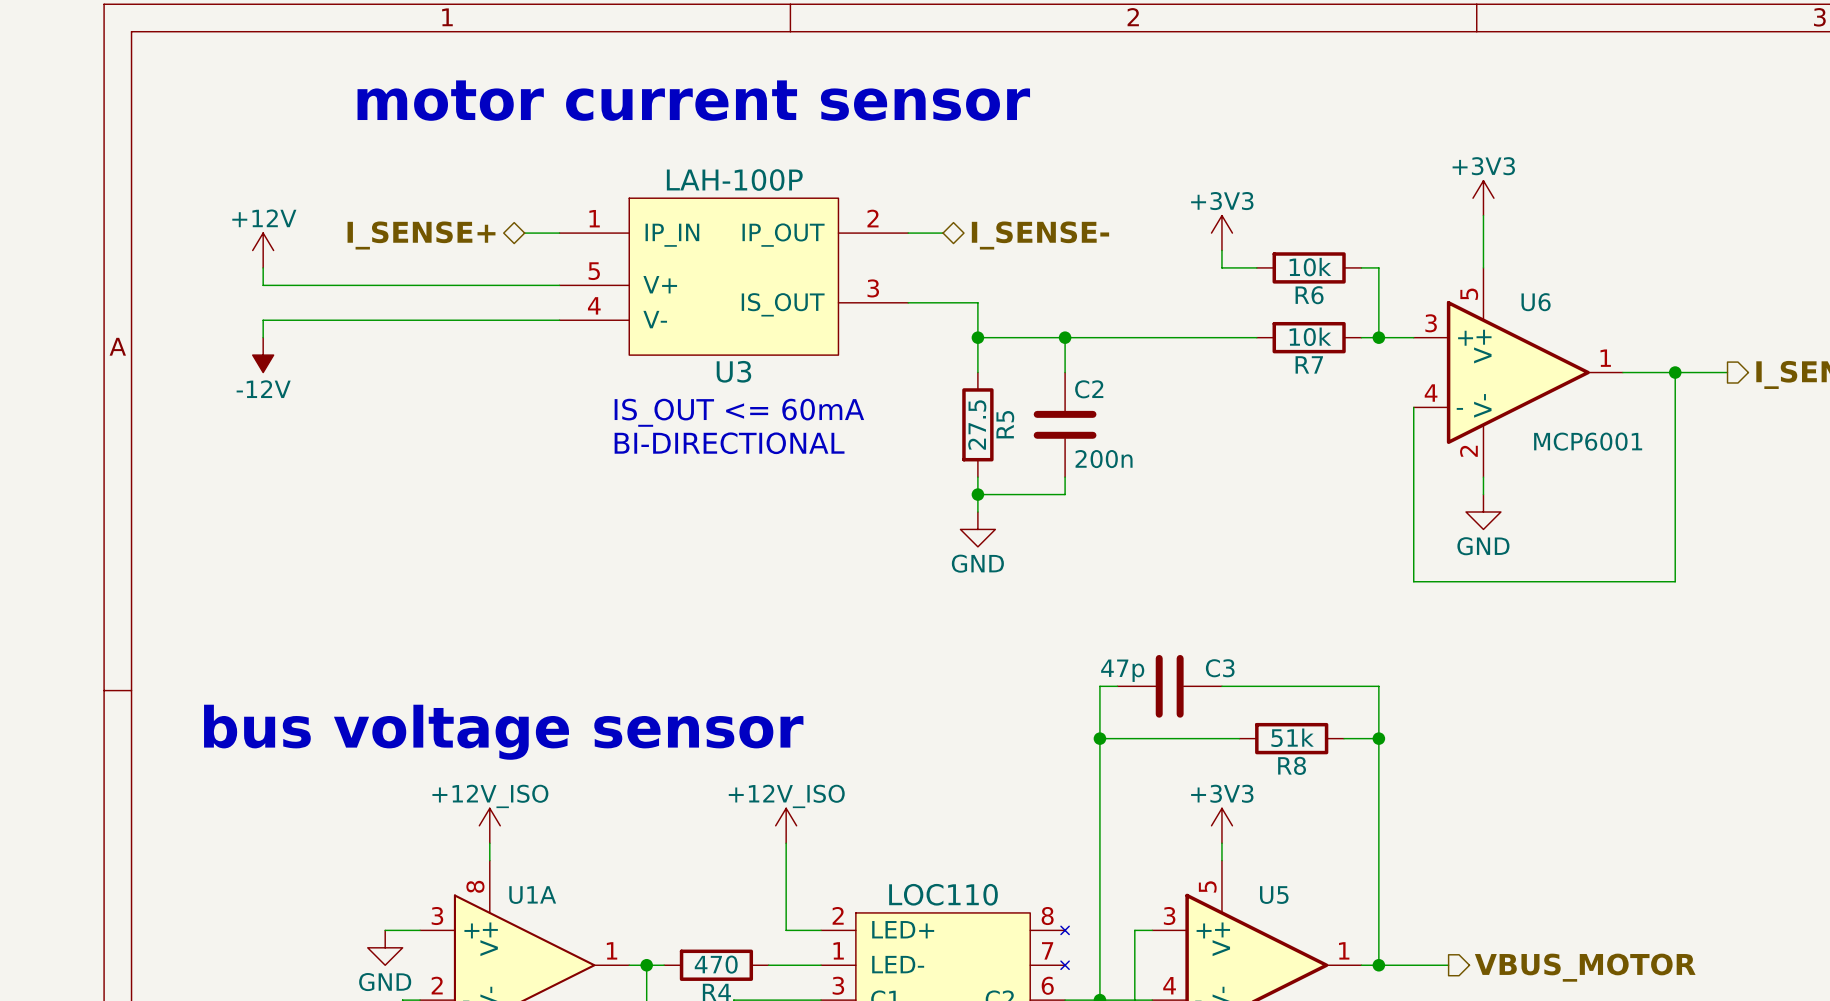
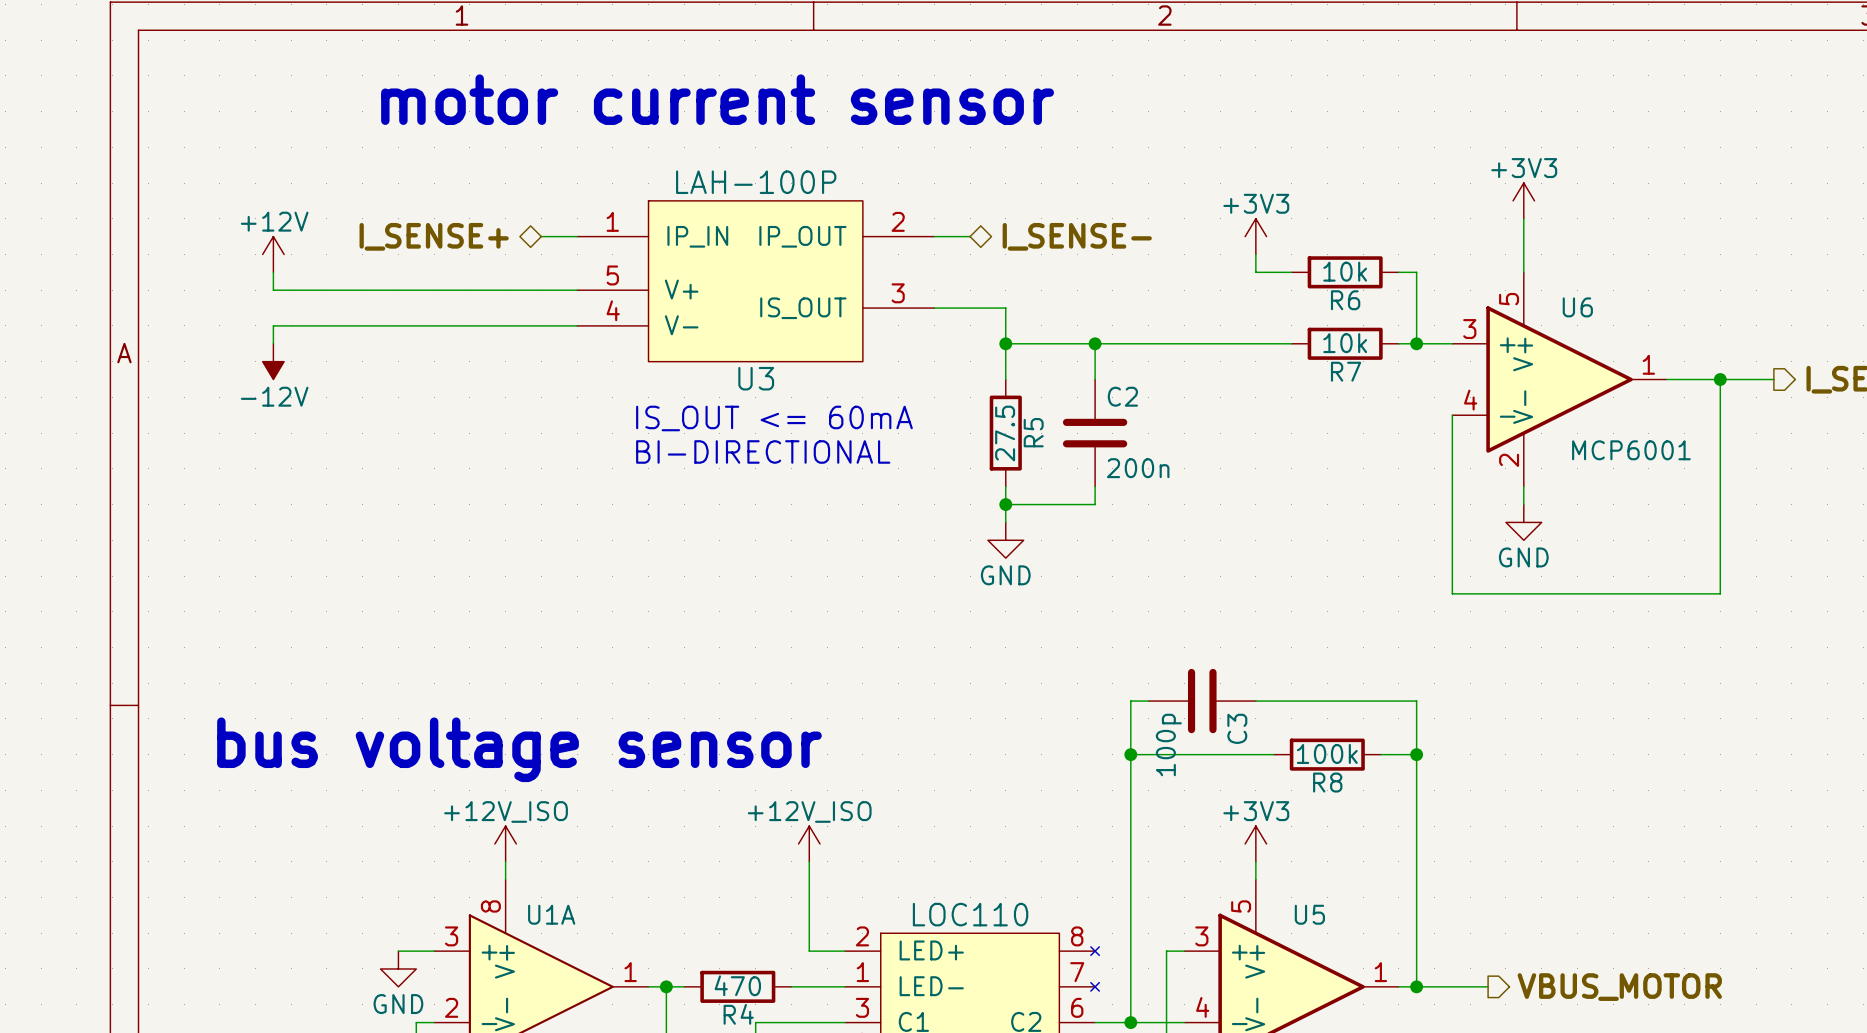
C3 name rotation: 0° (1220, 668) -> 90° counterclockwise (1237, 728)
C3 name position: C3 (1220, 668) -> C3 (1237, 728)
C3 value: 47p (1122, 670) -> 100p (1168, 744)
R8 value: 51k (1292, 737) -> 100k (1327, 753)

